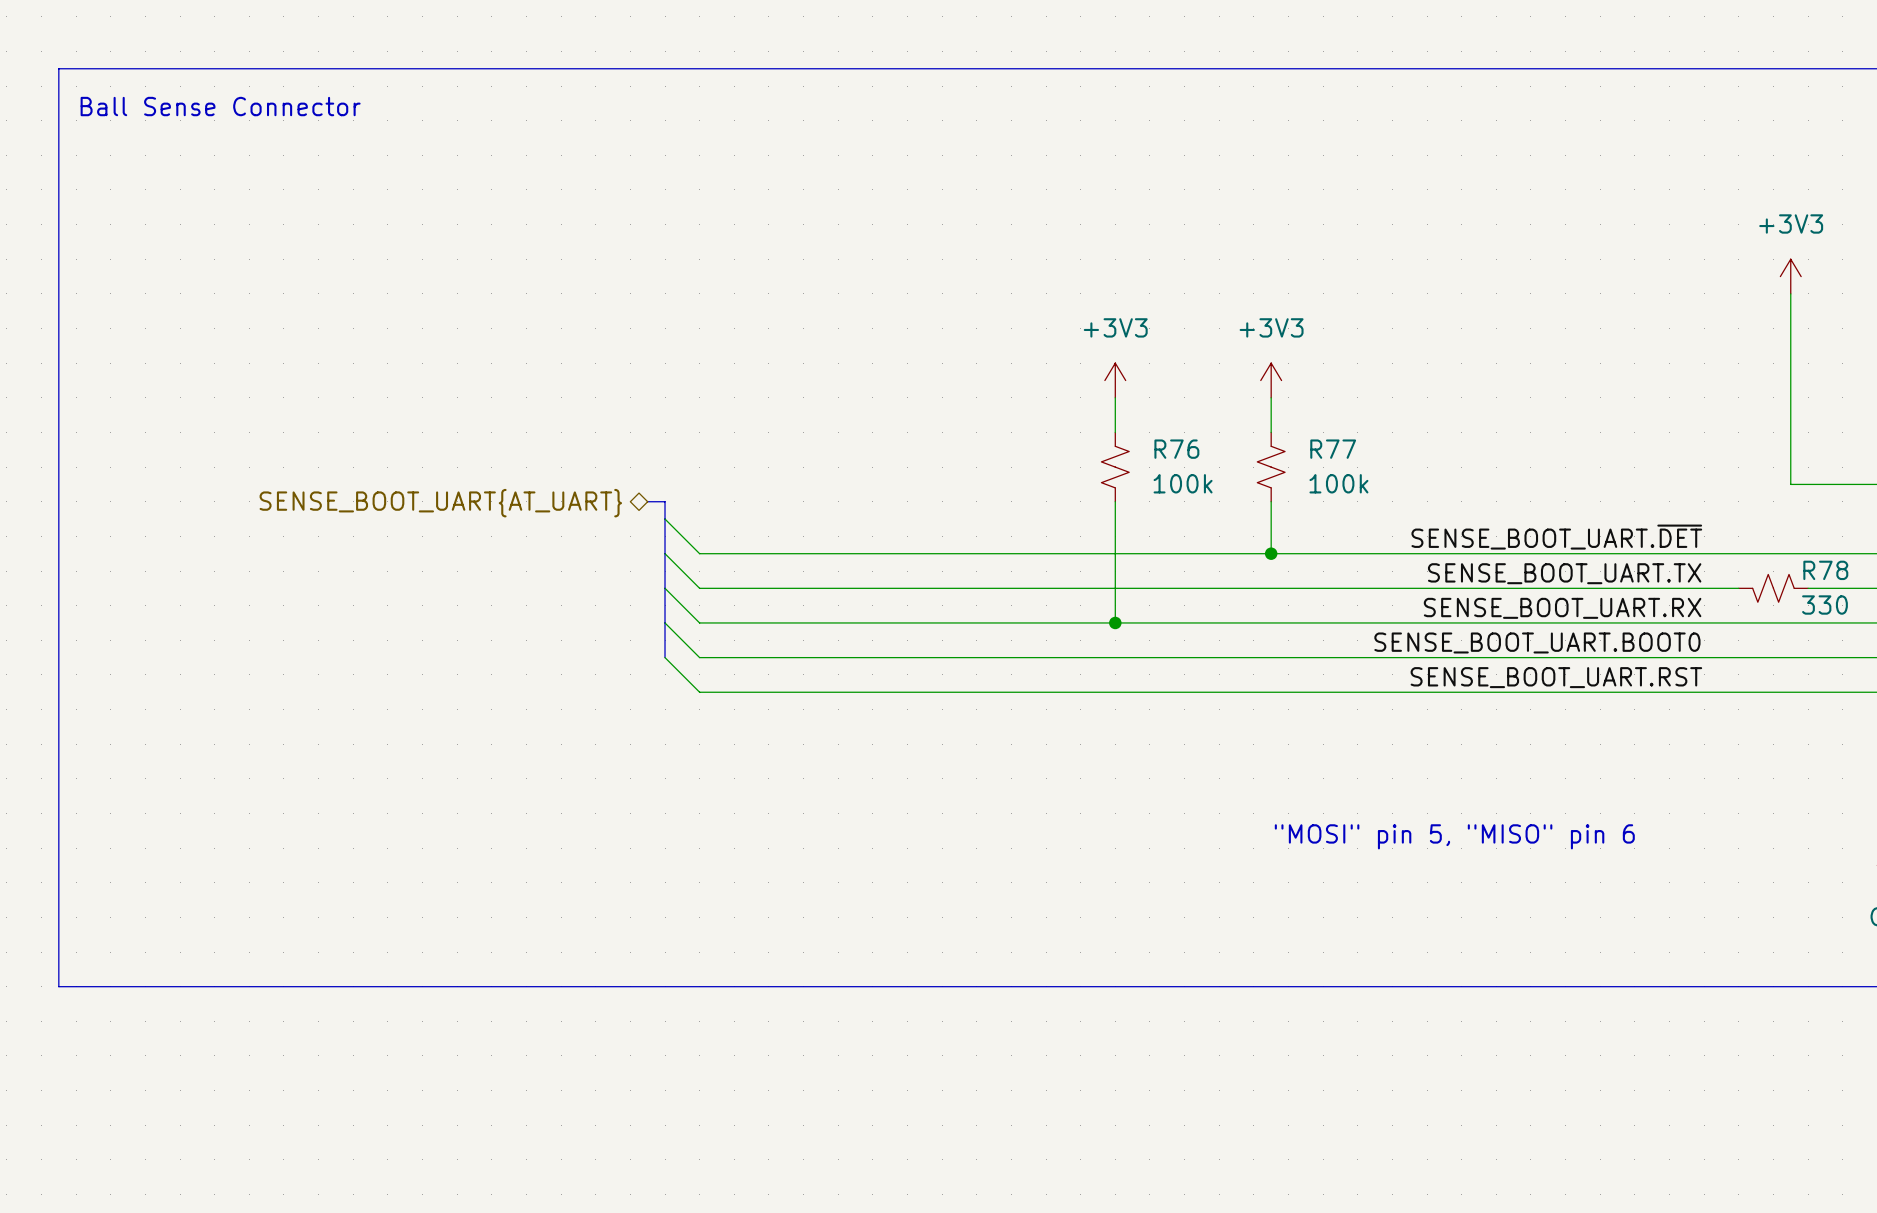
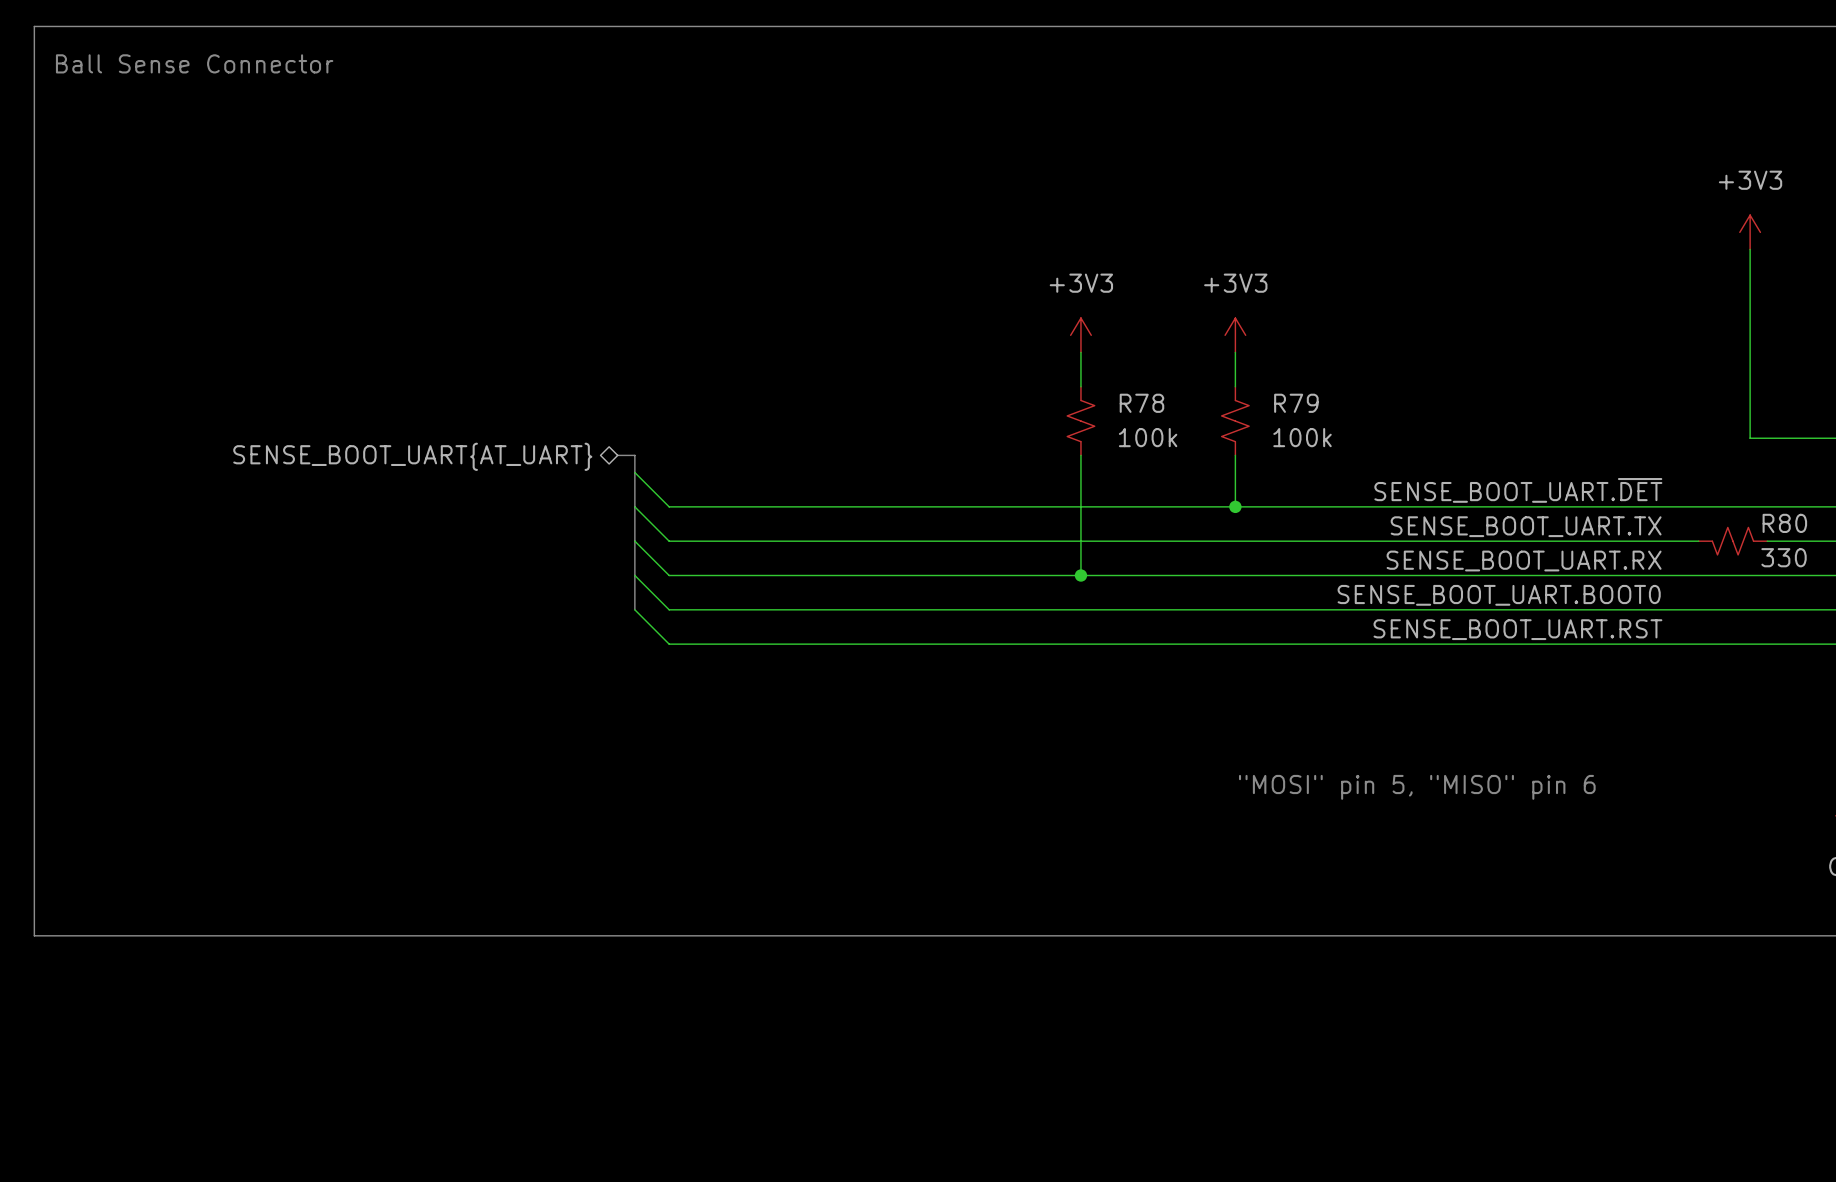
R76 name: R76 (1176, 449) -> R78 (1141, 403)
R77 name: R77 (1333, 449) -> R79 (1296, 403)
R78 name: R78 (1825, 570) -> R80 (1784, 523)

